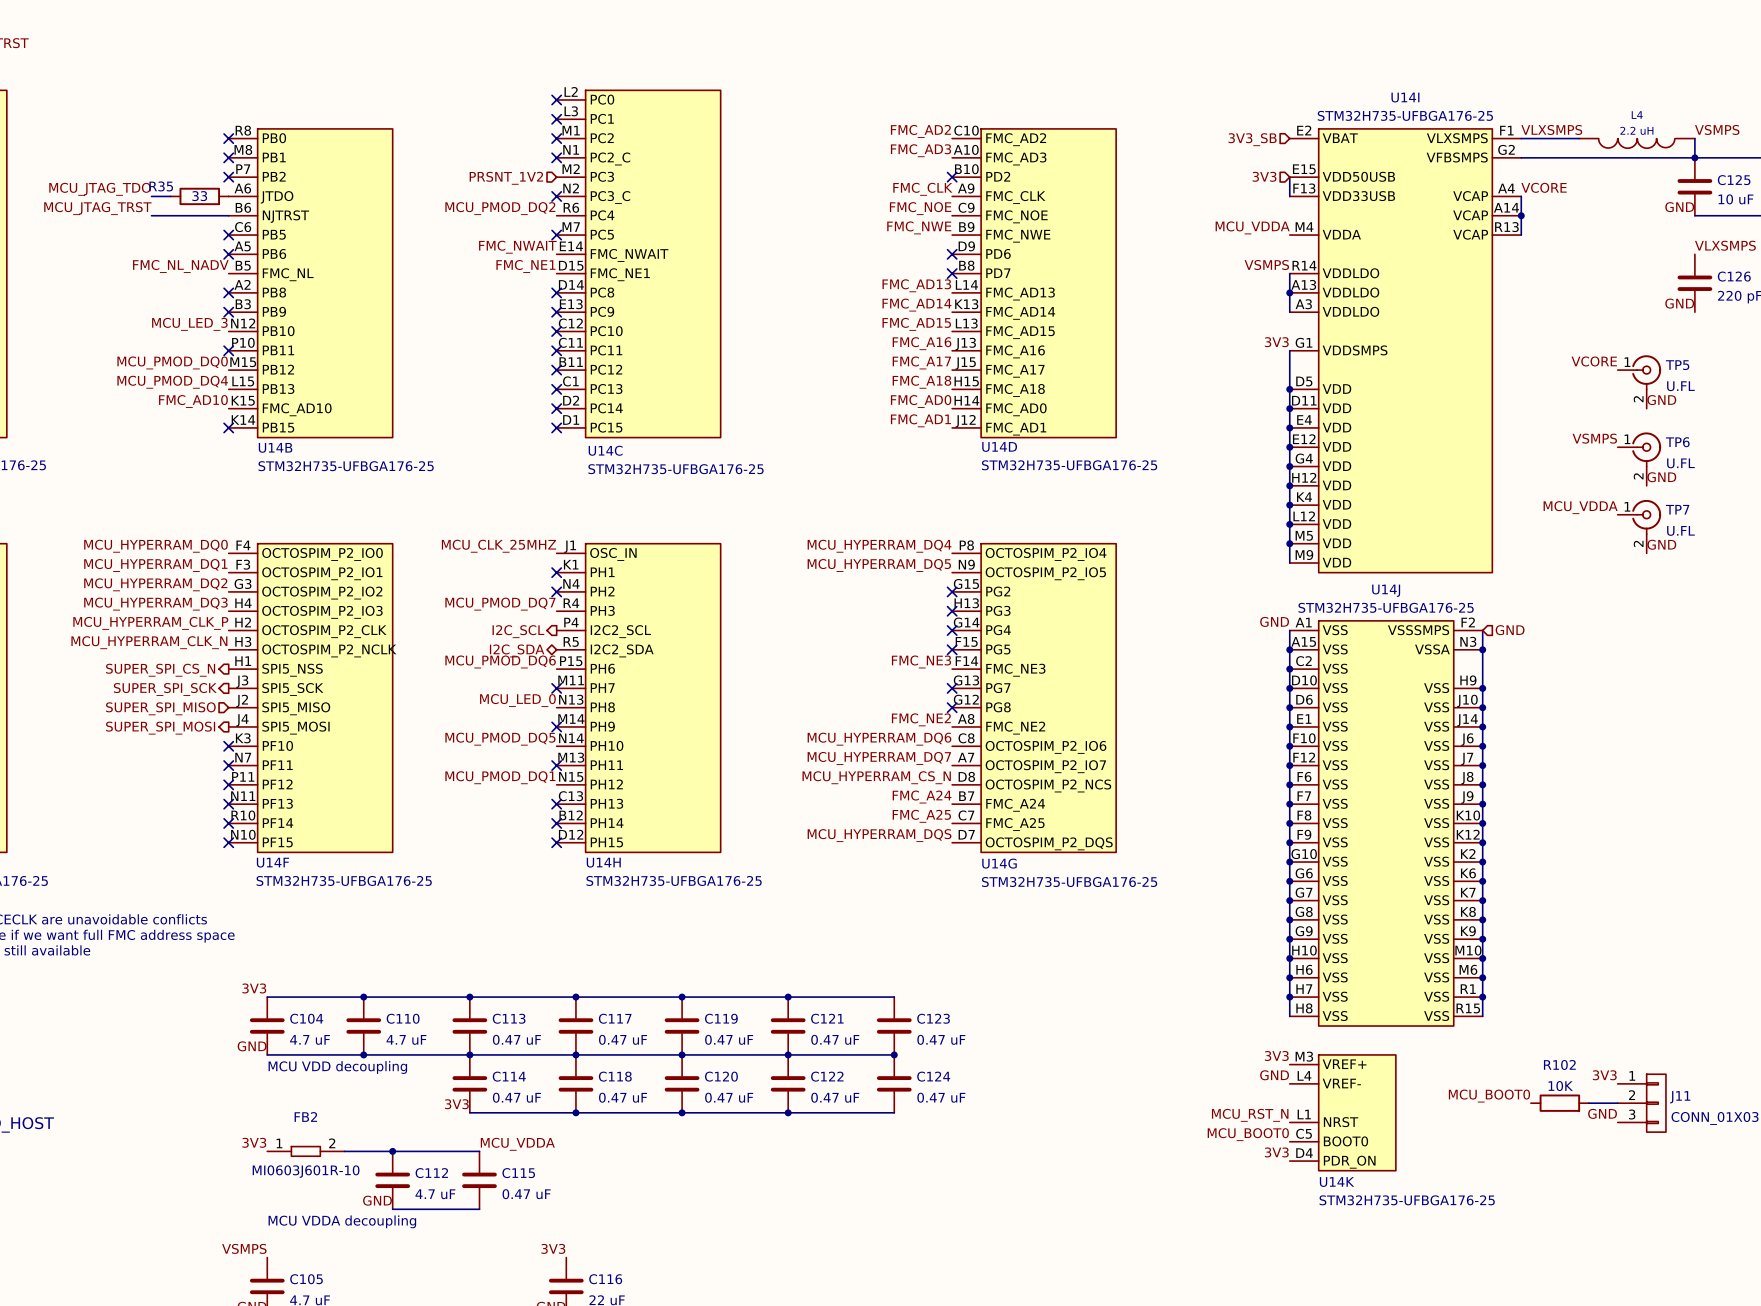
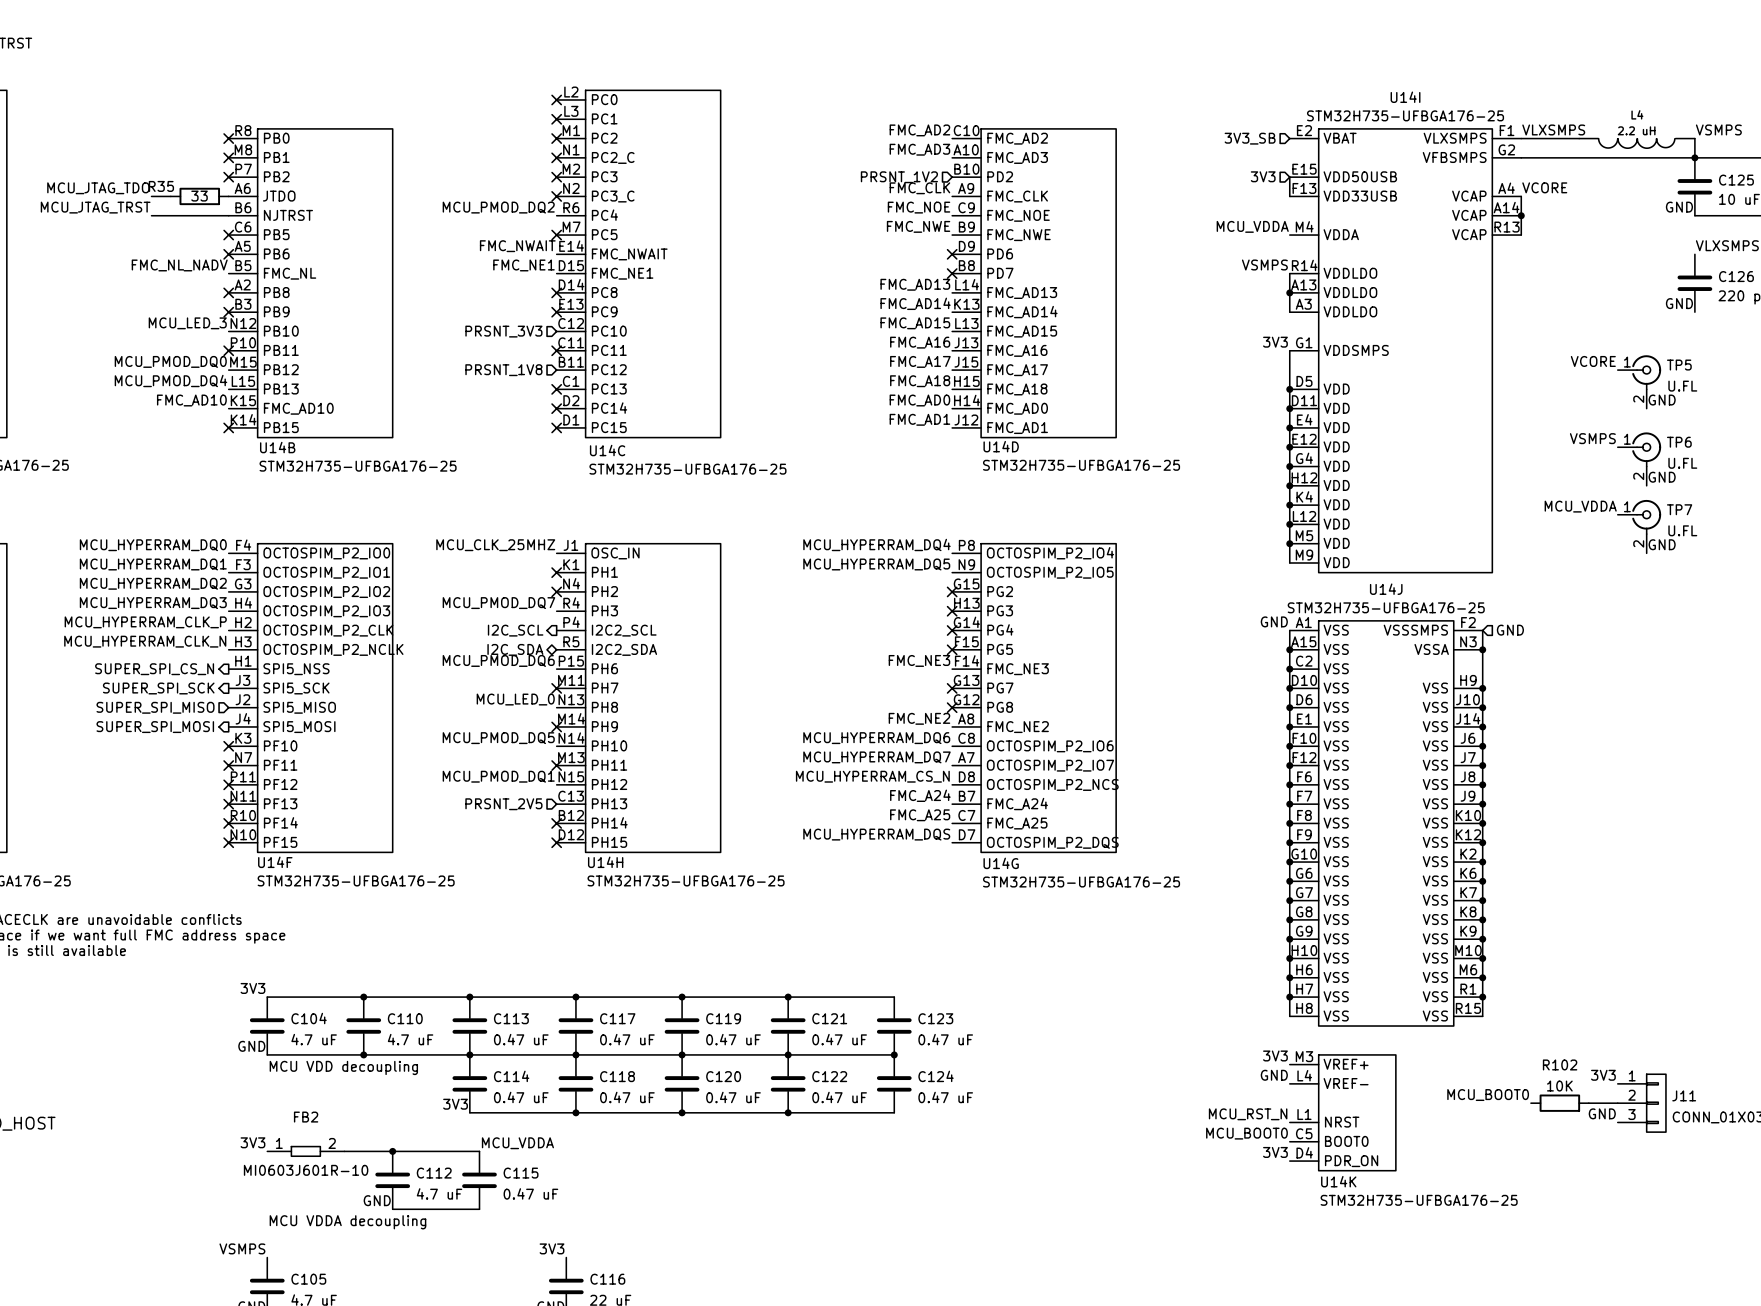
no-connect mark: none -> (556, 177)
no-connect mark: (952, 177) -> none
hierarchical label: PRSNT_1V2 (506, 178) -> none
hierarchical label: none -> PRSNT_1V2 (899, 177)
no-connect mark: (556, 331) -> none
hierarchical label: none -> PRSNT_3V3 (503, 331)
no-connect mark: (556, 370) -> none
hierarchical label: none -> PRSNT_1V8 (503, 370)
no-connect mark: (556, 804) -> none
hierarchical label: none -> PRSNT_2V5 (503, 804)

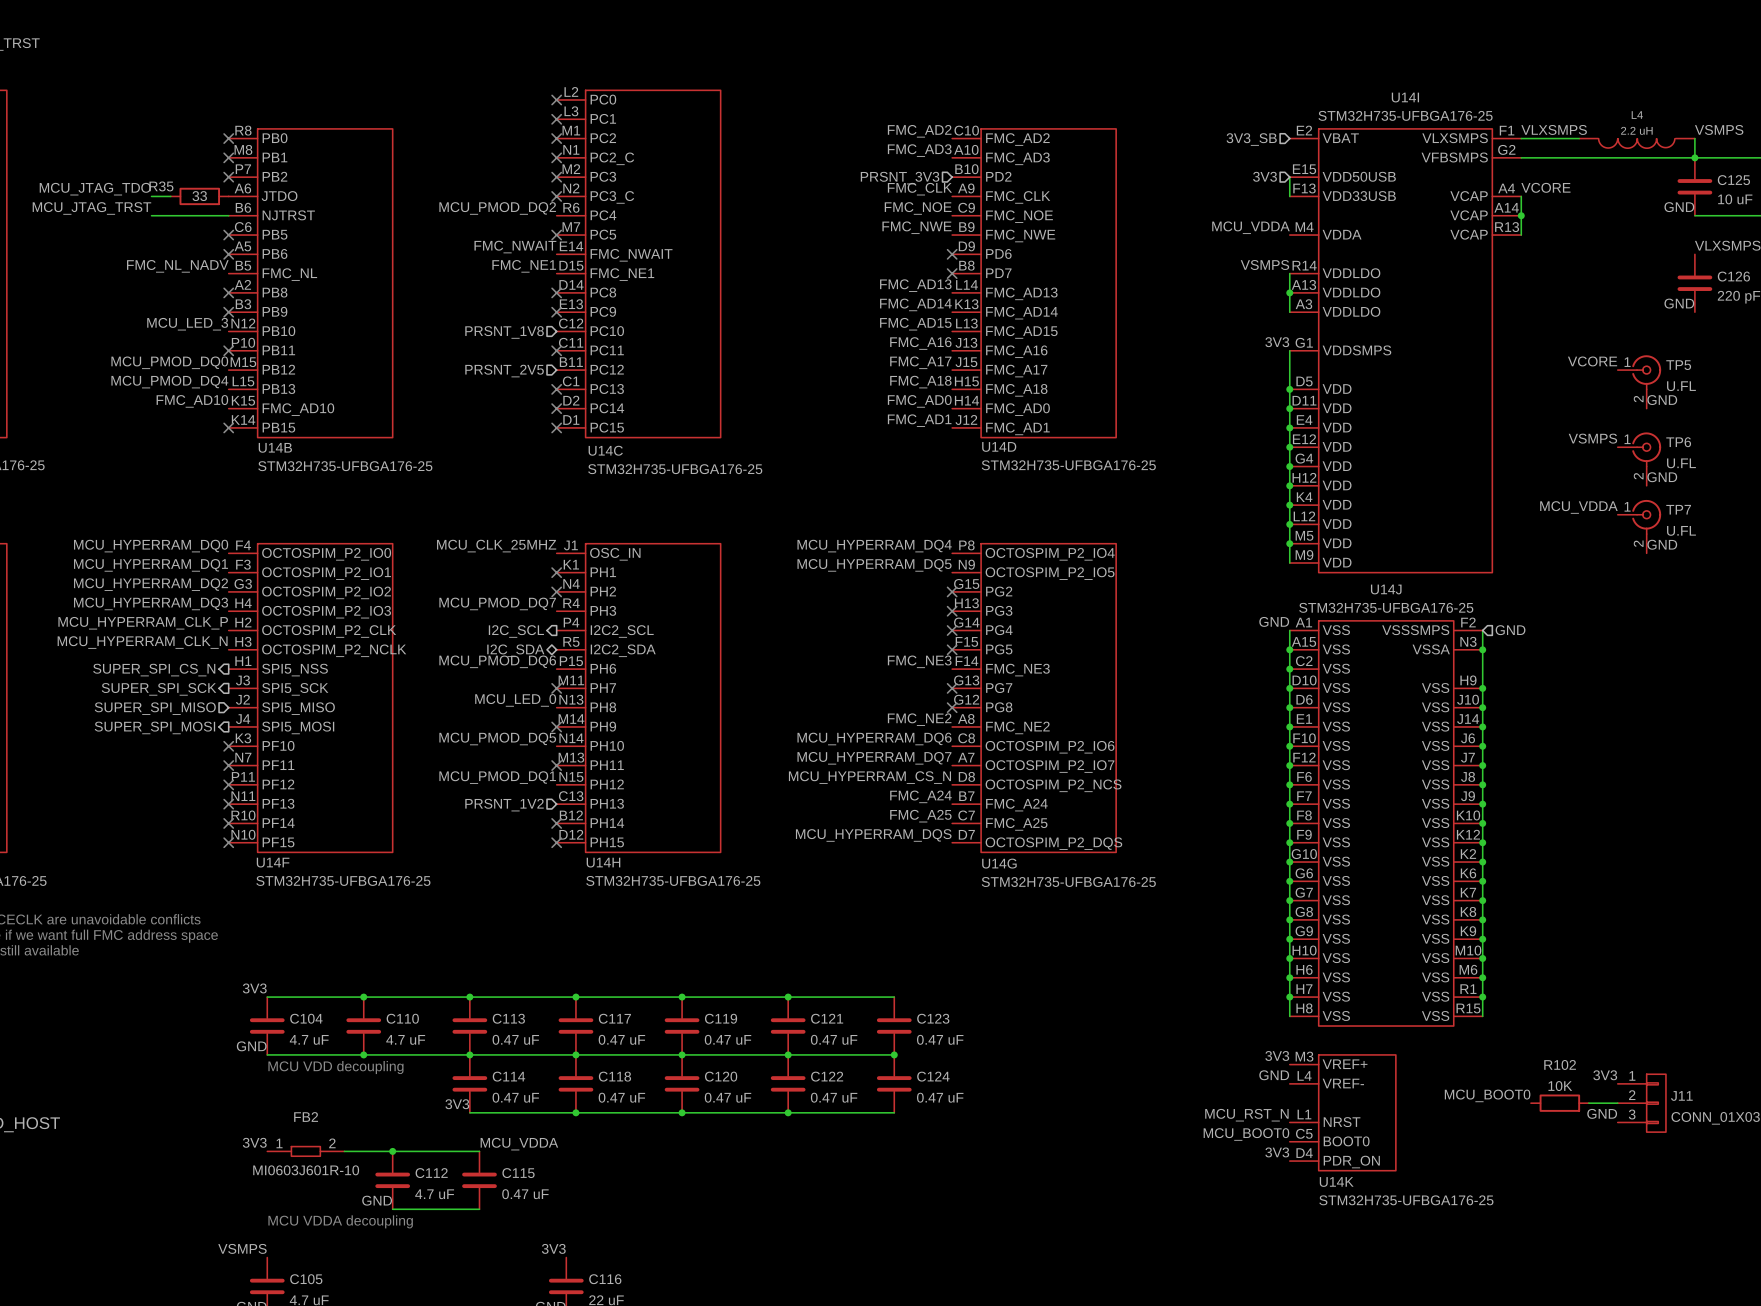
hierarchical label: PRSNT_1V2 (899, 177) -> PRSNT_3V3 (900, 178)
hierarchical label: PRSNT_3V3 (503, 331) -> PRSNT_1V8 (504, 332)
hierarchical label: PRSNT_1V8 (503, 370) -> PRSNT_2V5 (504, 371)
hierarchical label: PRSNT_2V5 (503, 804) -> PRSNT_1V2 (504, 805)

